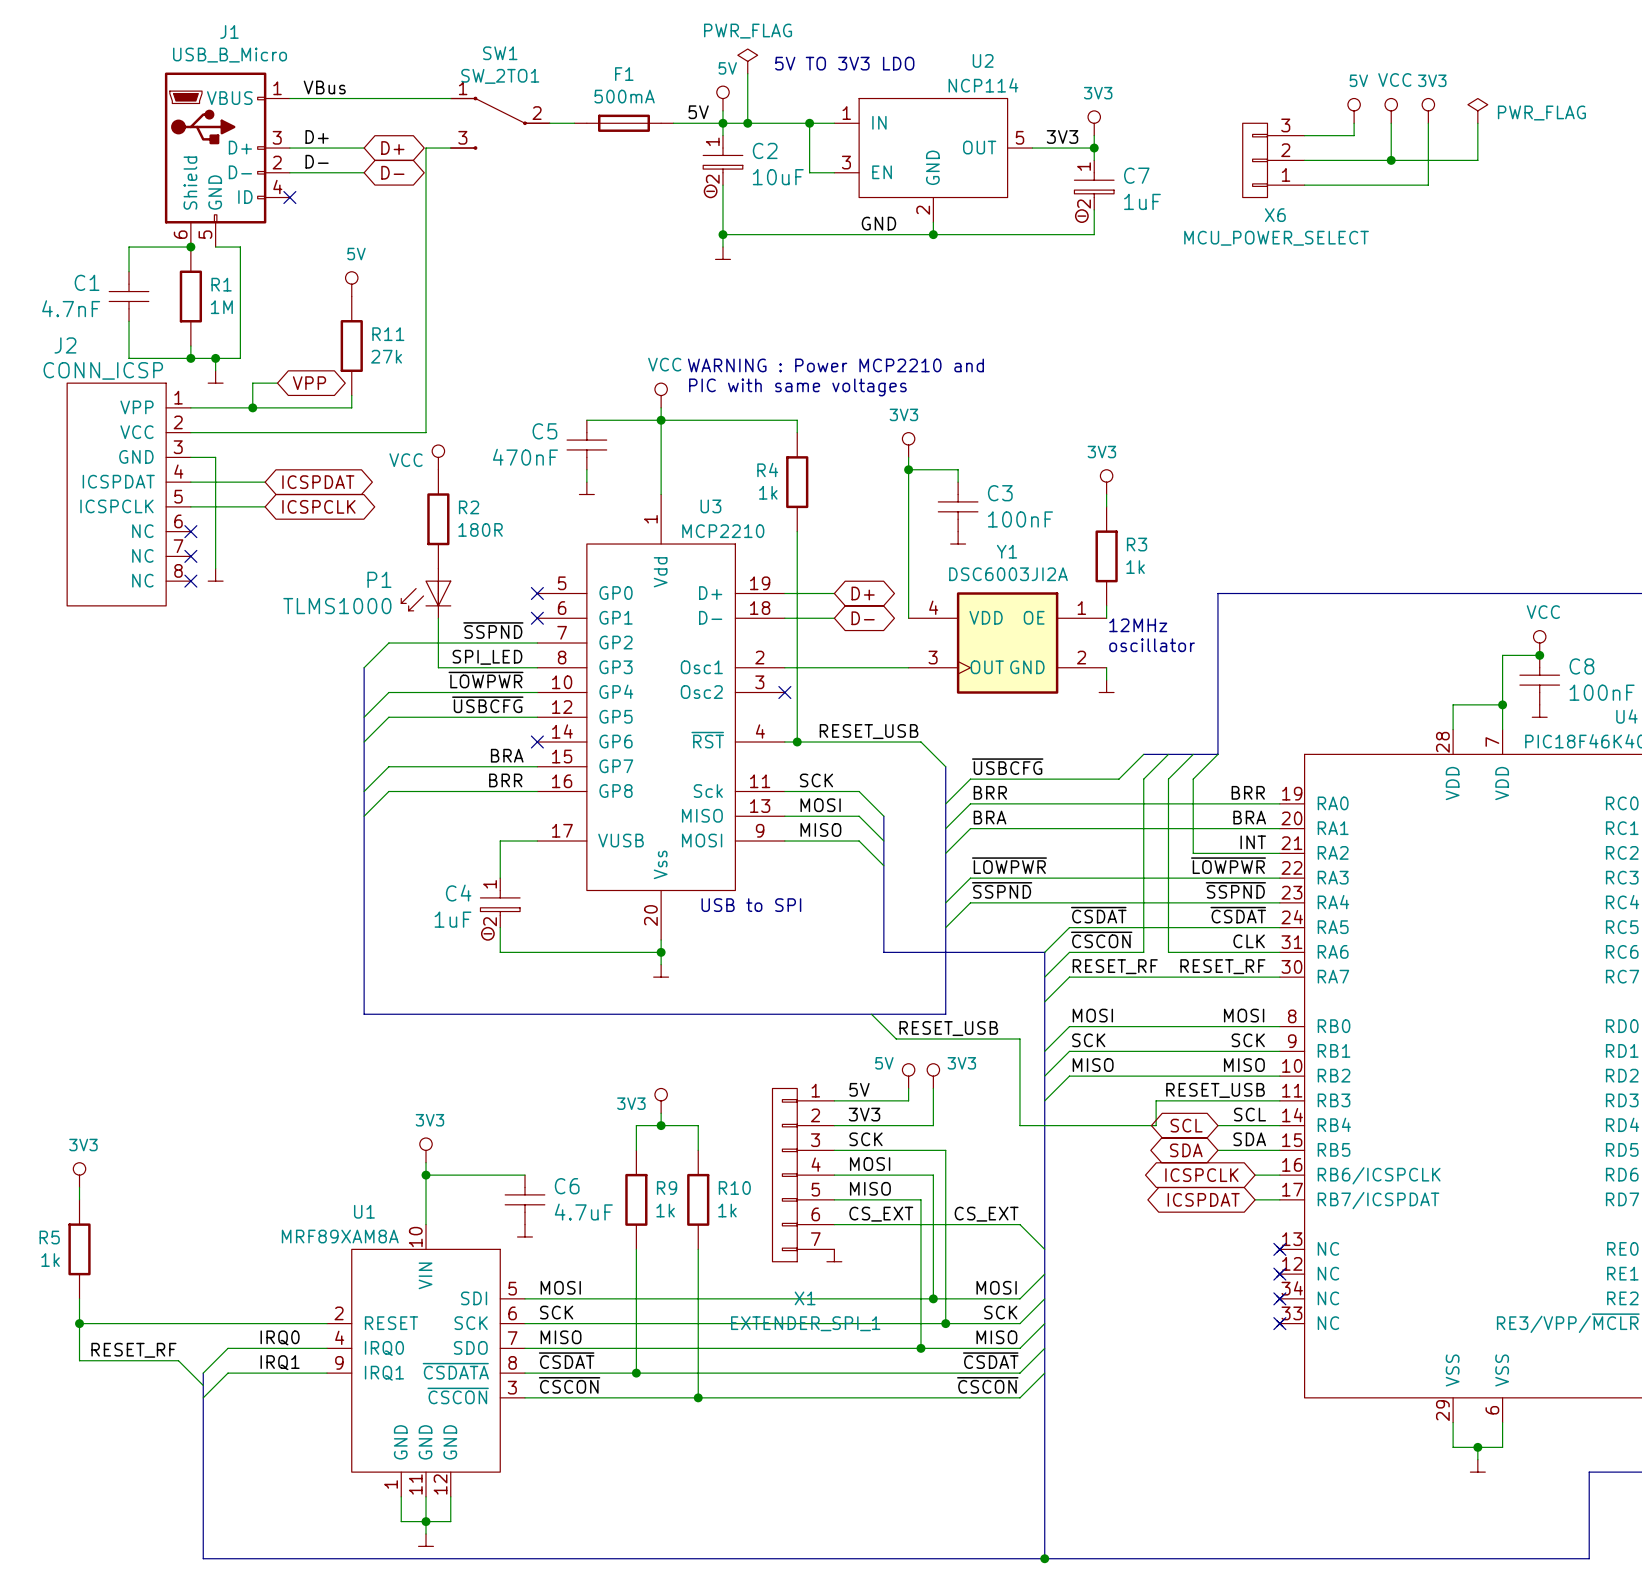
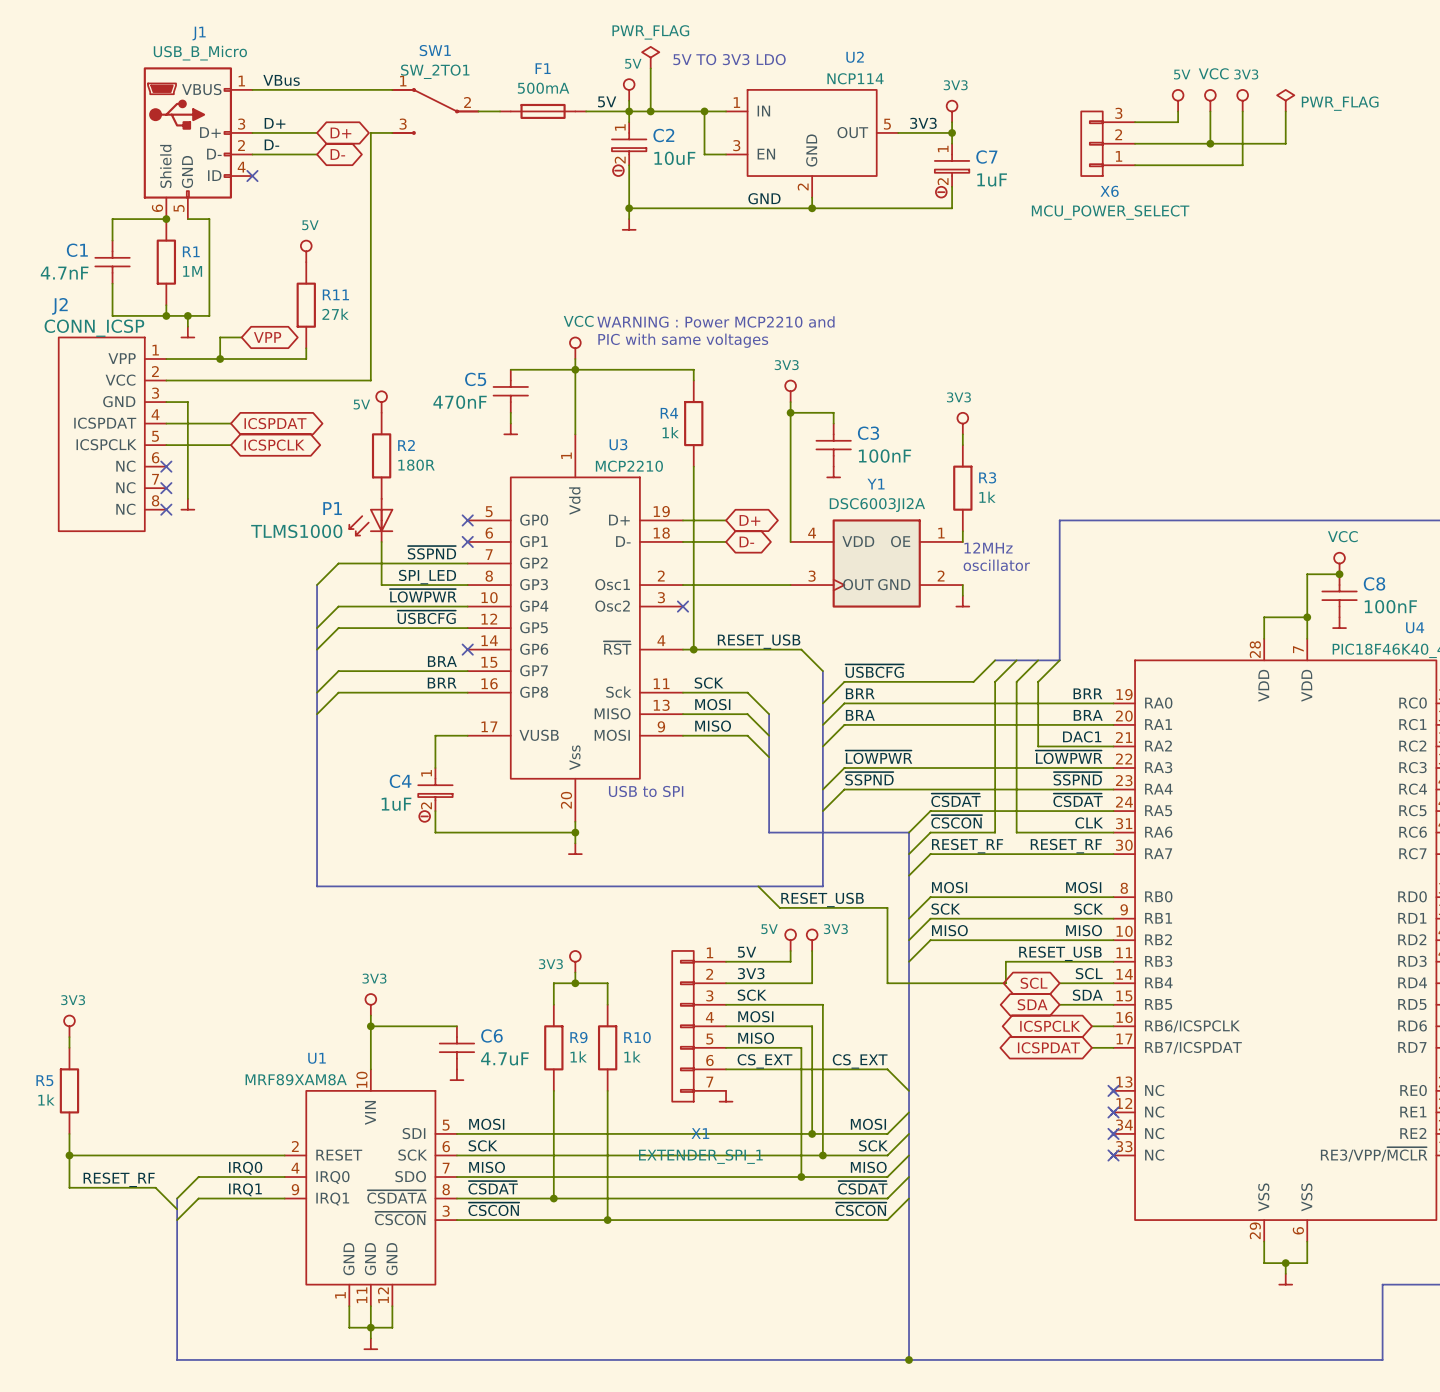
power symbol: VCC (438, 457) -> 5V (381, 402)
label: INT (1253, 842) -> DAC1 (1082, 736)

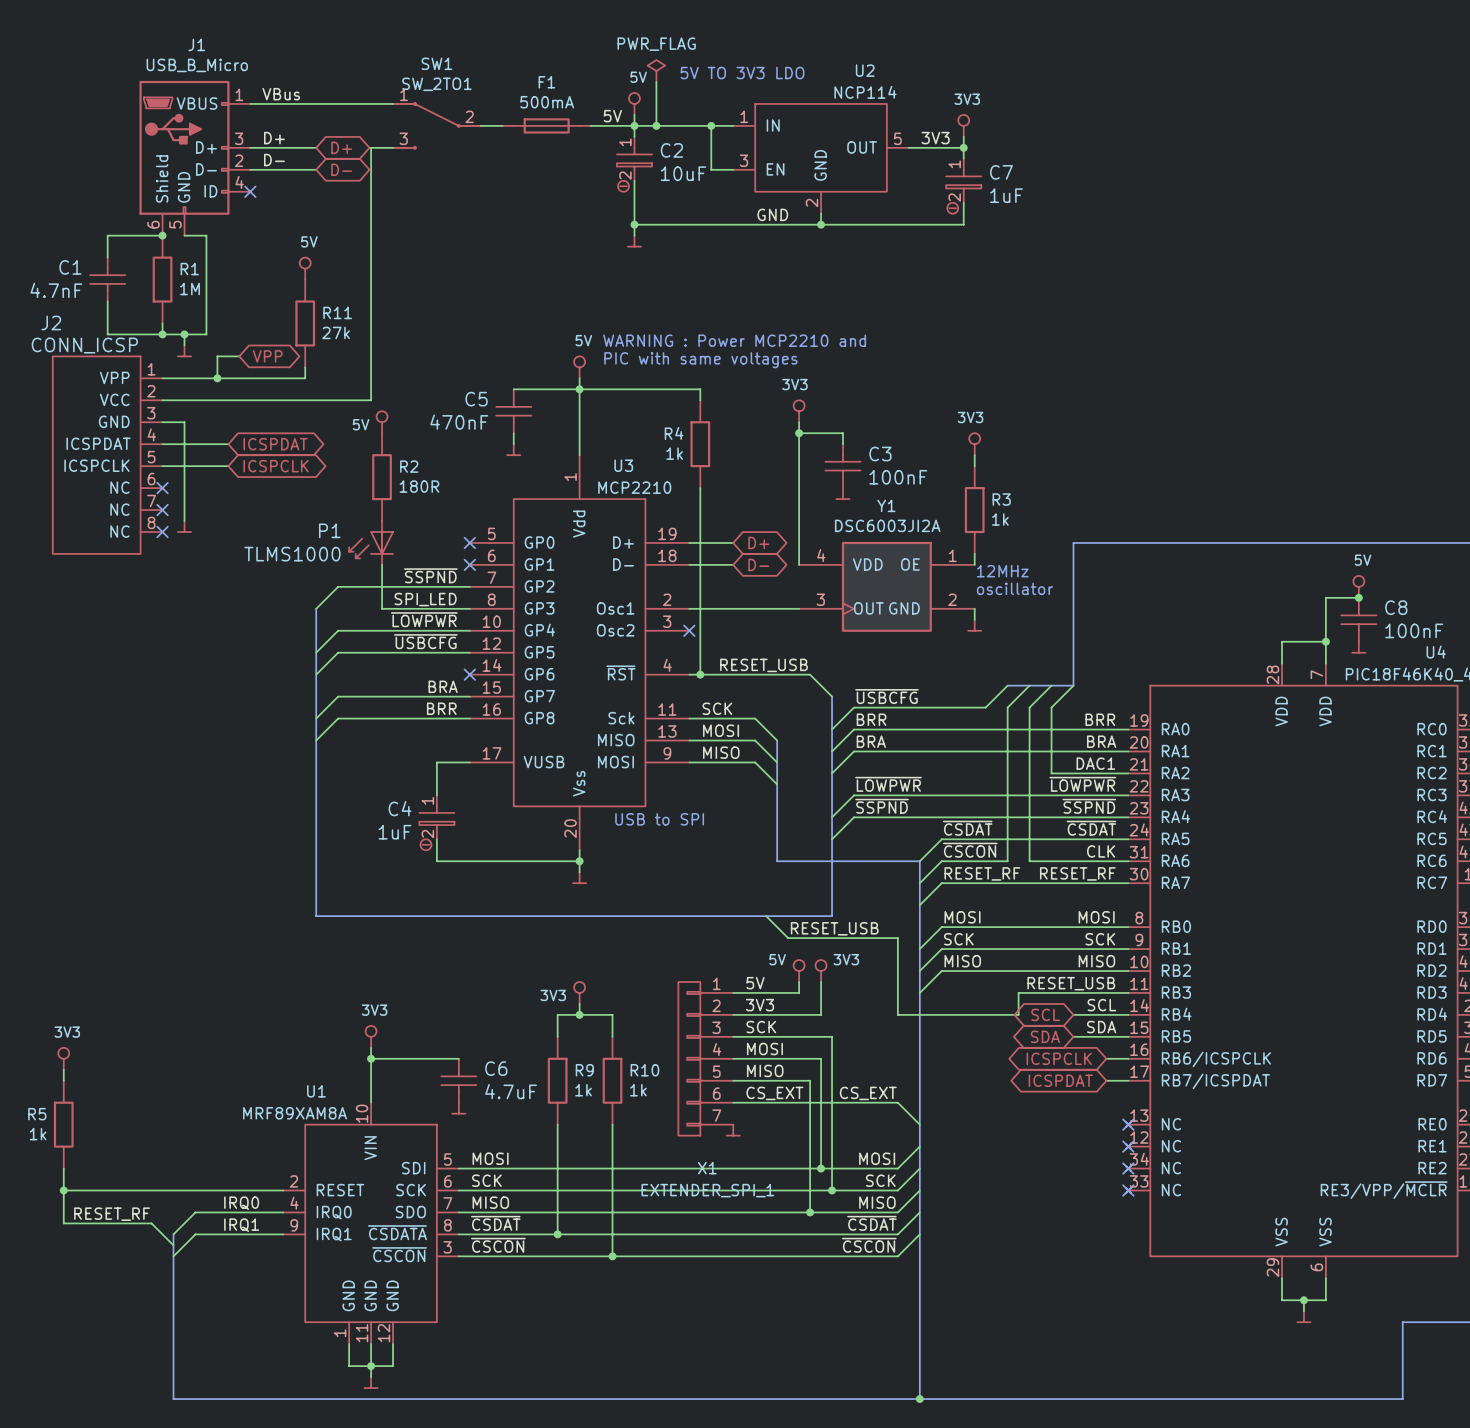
power symbol: 5V (1178, 100) -> none
power symbol: VCC (1210, 100) -> none
power symbol: 3V3 (1242, 100) -> none
power symbol: PWR_FLAG (1285, 100) -> none
wire: (1178, 111) (1178, 122) (1135, 122) -> none
wire: (1210, 111) (1210, 143) -> none
wire: (1242, 111) (1242, 165) (1135, 165) -> none
wire: (1285, 111) (1285, 143) (1135, 143) -> none
X6: MCU_POWER_SELECT (1108, 143) -> none
junction: (1210, 143) -> none
power symbol: VCC (575, 348) -> 5V (579, 367)
power symbol: VCC (1339, 563) -> 5V (1358, 586)

